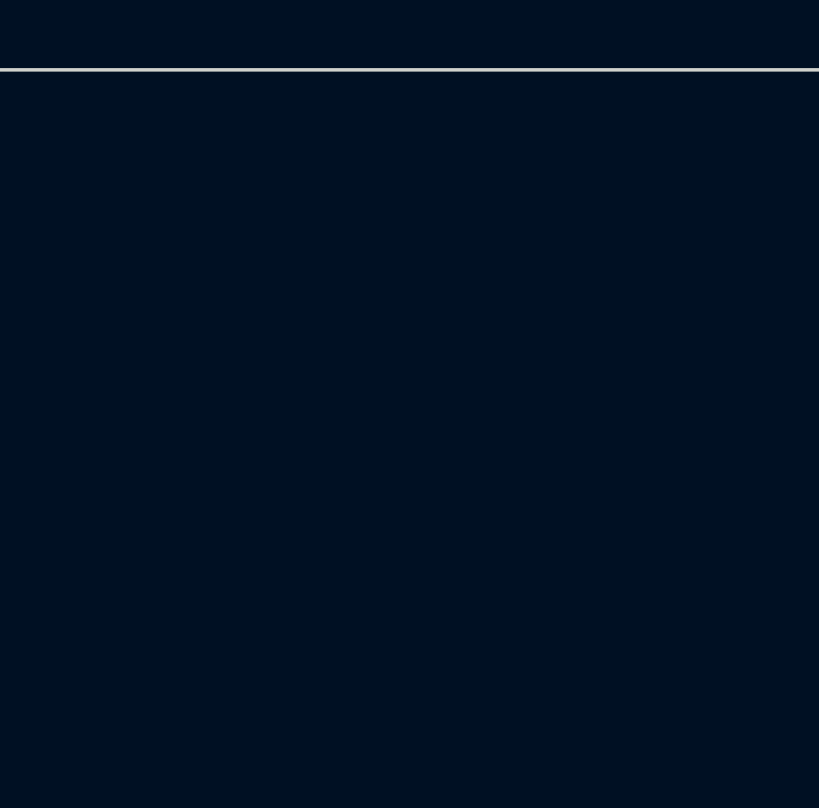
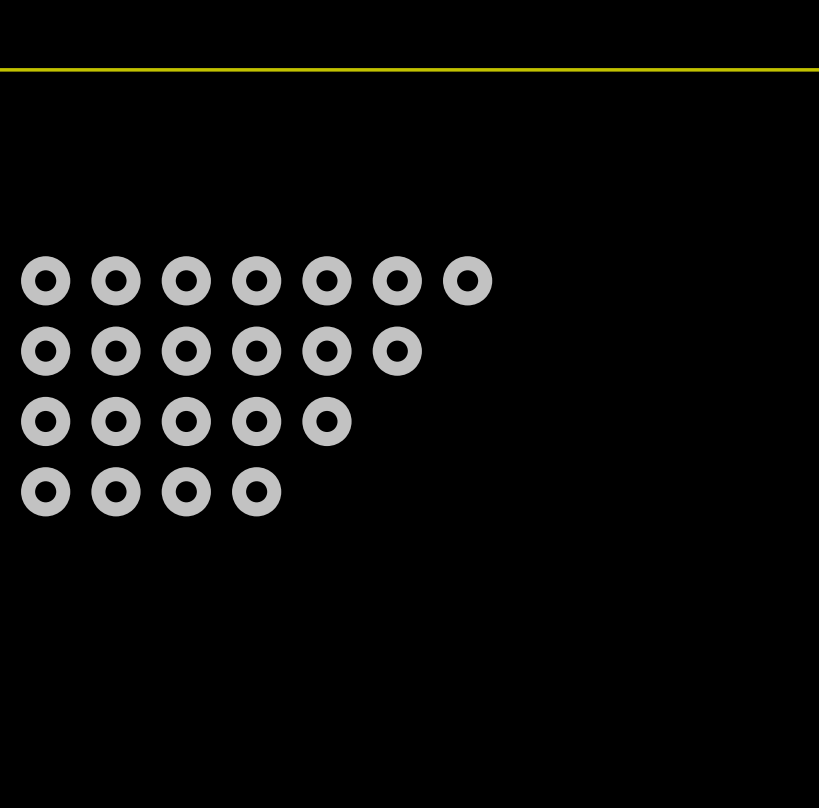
via: none -> (45, 280)
via: none -> (115, 280)
via: none -> (186, 280)
via: none -> (256, 280)
via: none -> (326, 280)
via: none -> (397, 280)
via: none -> (467, 280)
via: none -> (45, 351)
via: none -> (115, 351)
via: none -> (186, 351)
via: none -> (256, 351)
via: none -> (326, 351)
via: none -> (397, 351)
via: none -> (45, 421)
via: none -> (115, 421)
via: none -> (186, 421)
via: none -> (256, 421)
via: none -> (326, 421)
via: none -> (45, 491)
via: none -> (115, 491)
via: none -> (186, 491)
via: none -> (256, 491)

